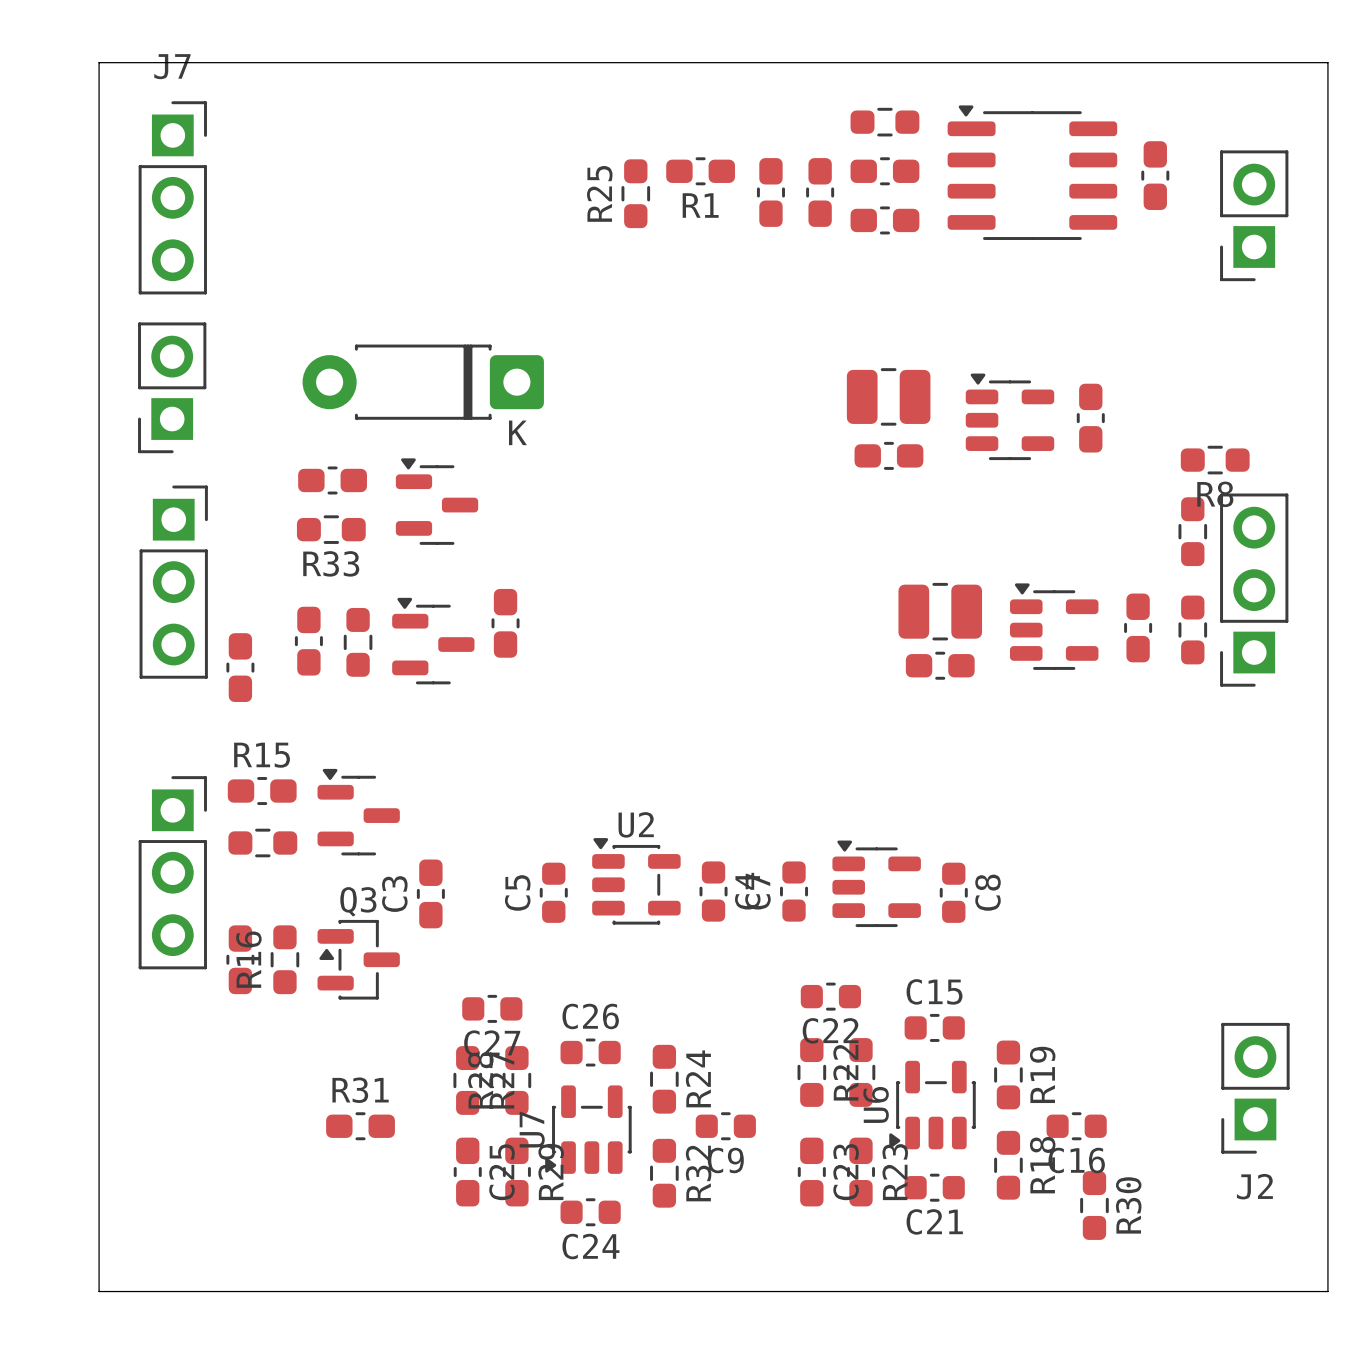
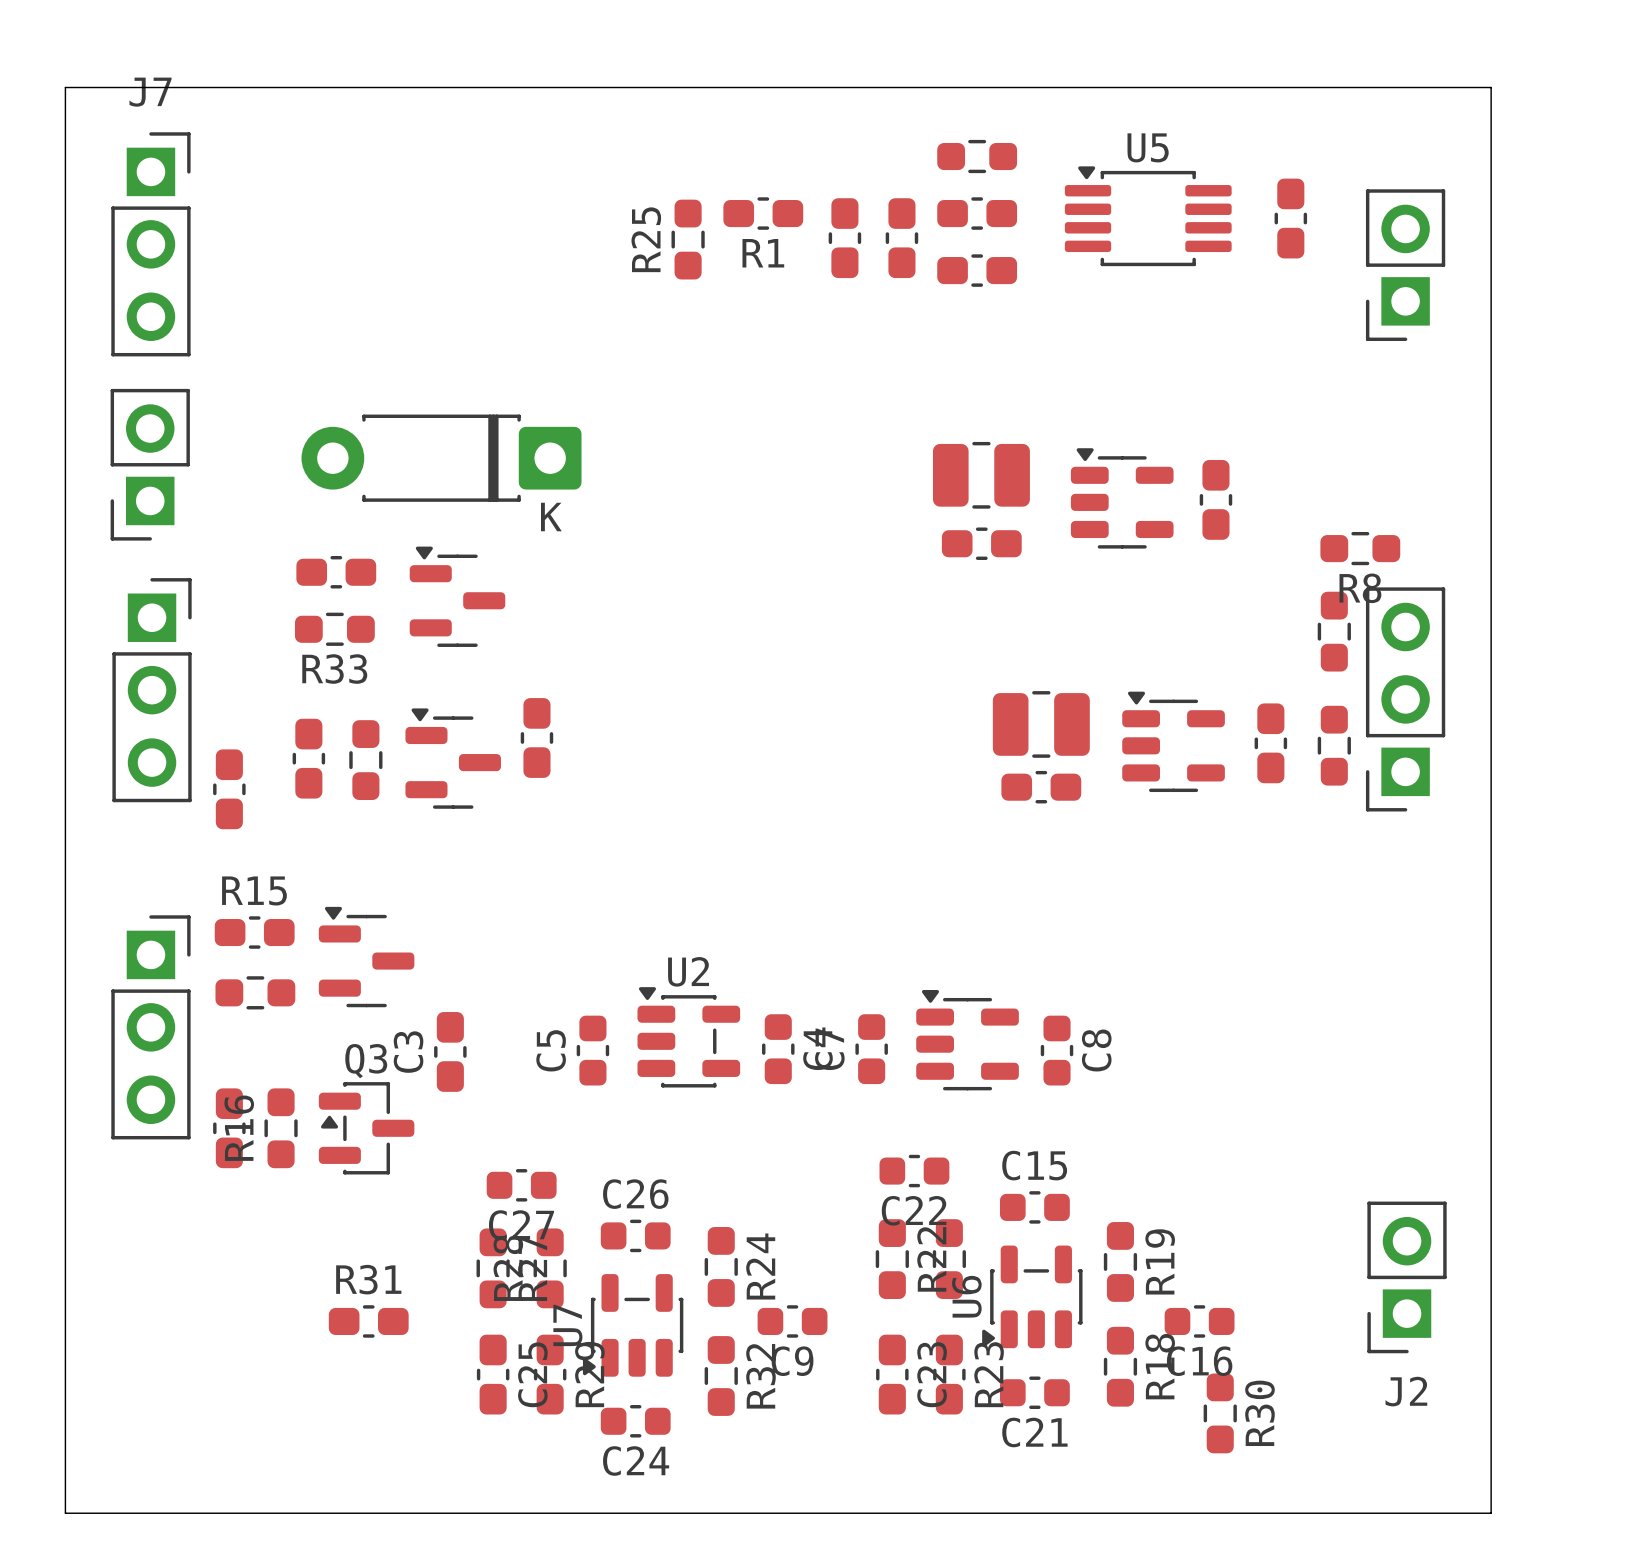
part: (1032, 172) -> none
U5: none -> (1148, 216)

